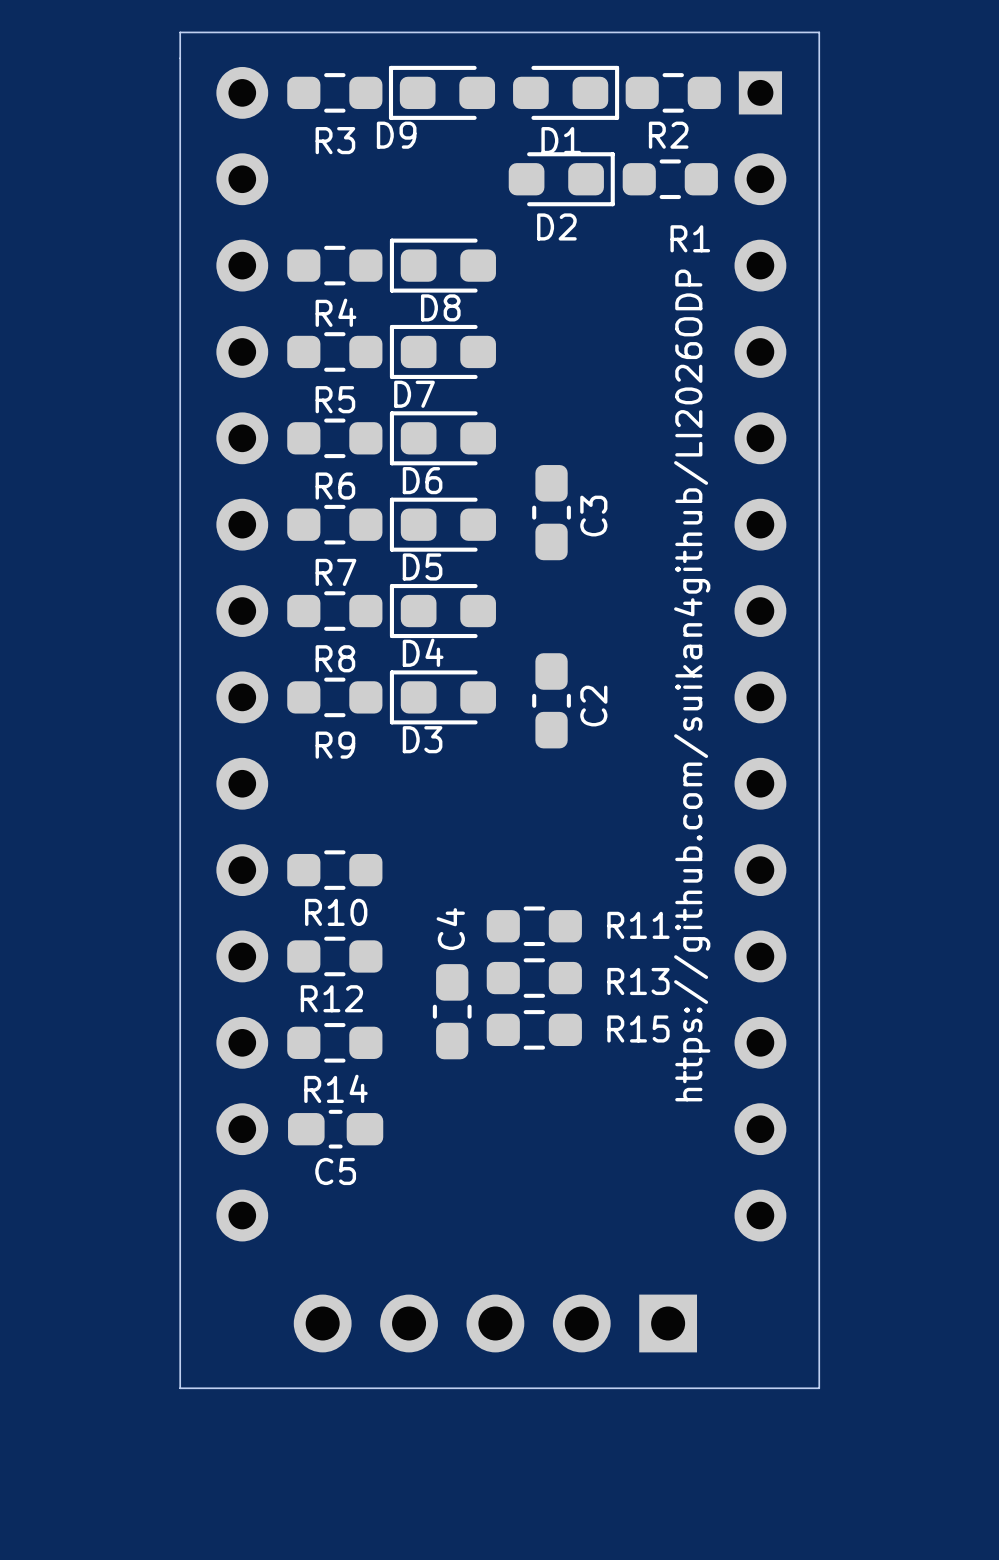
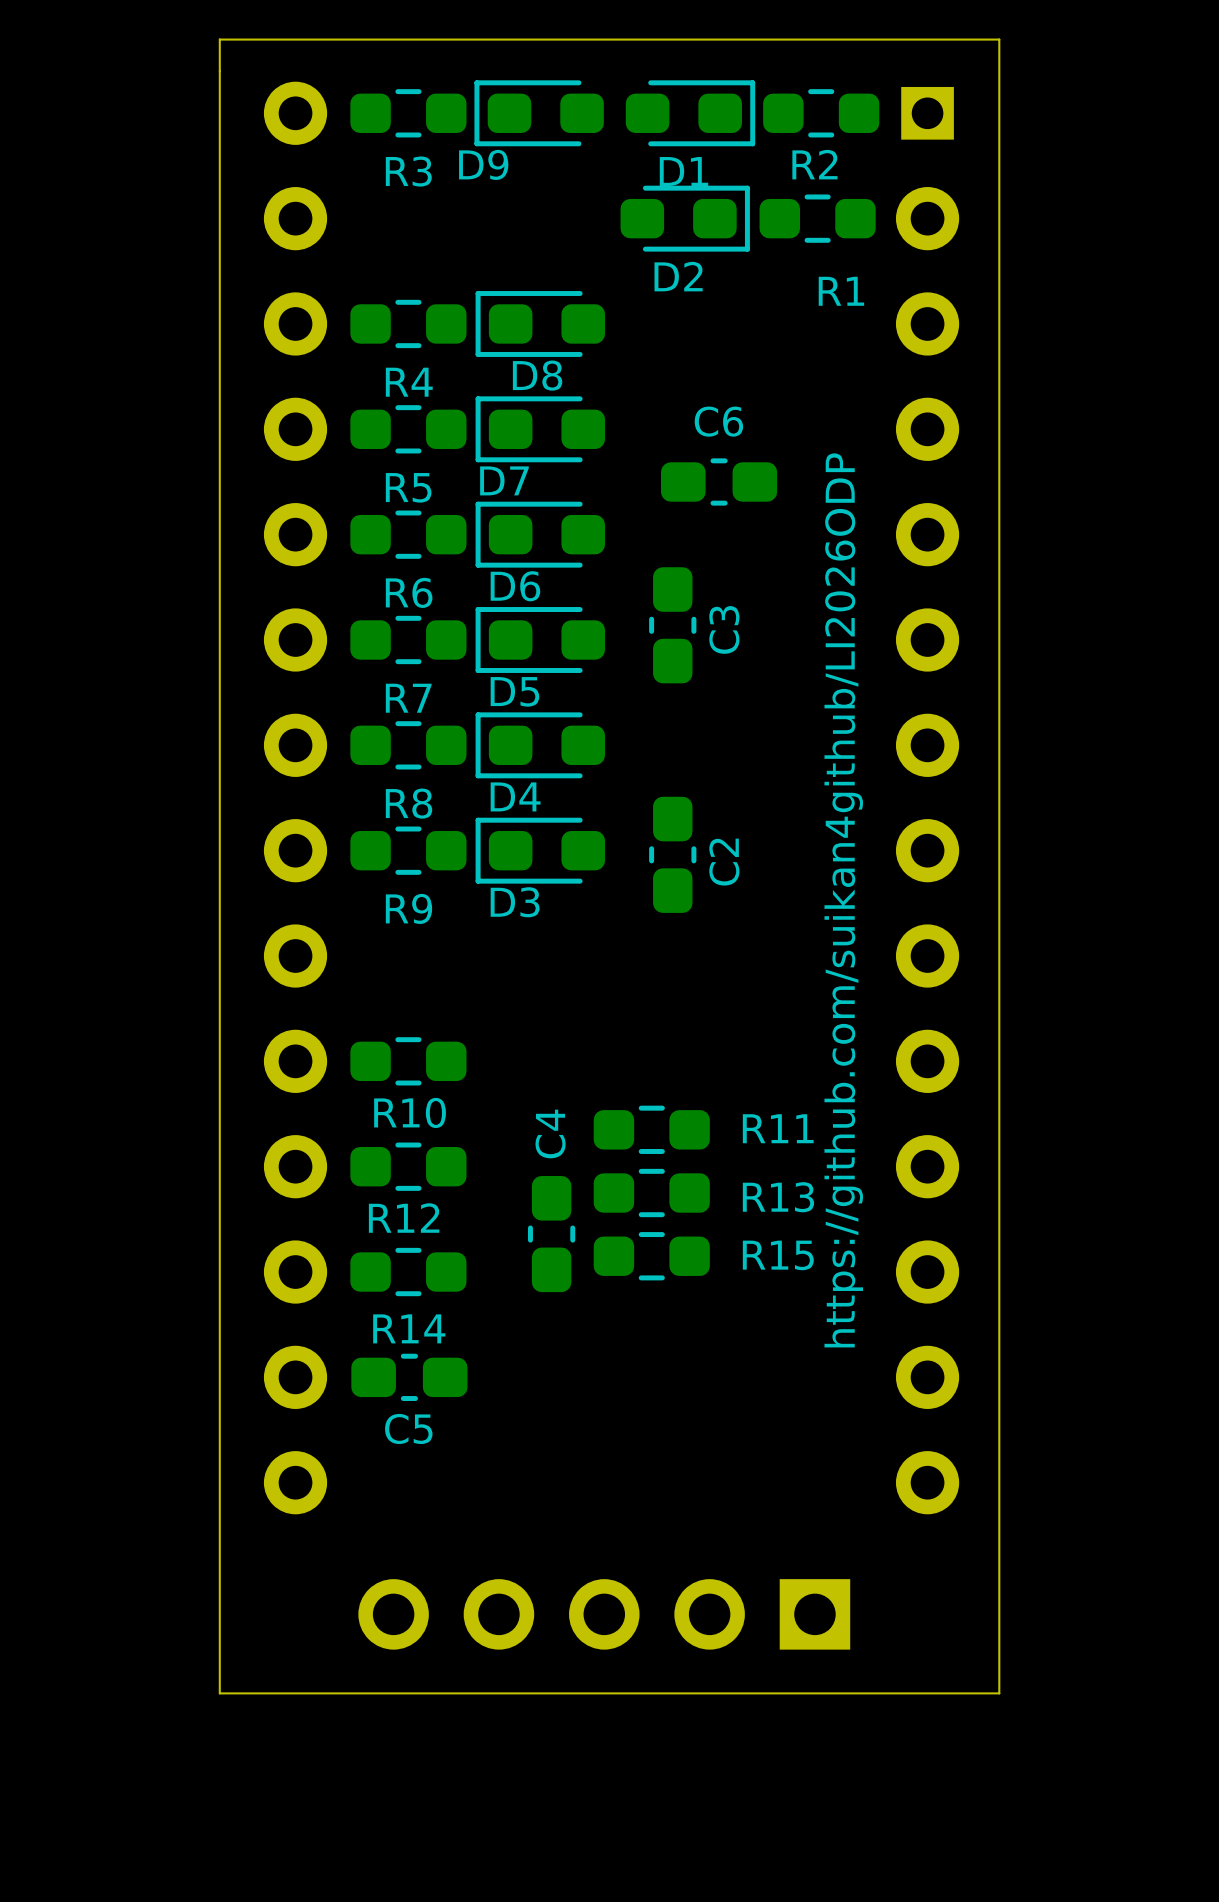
C6: none -> (719, 481)

